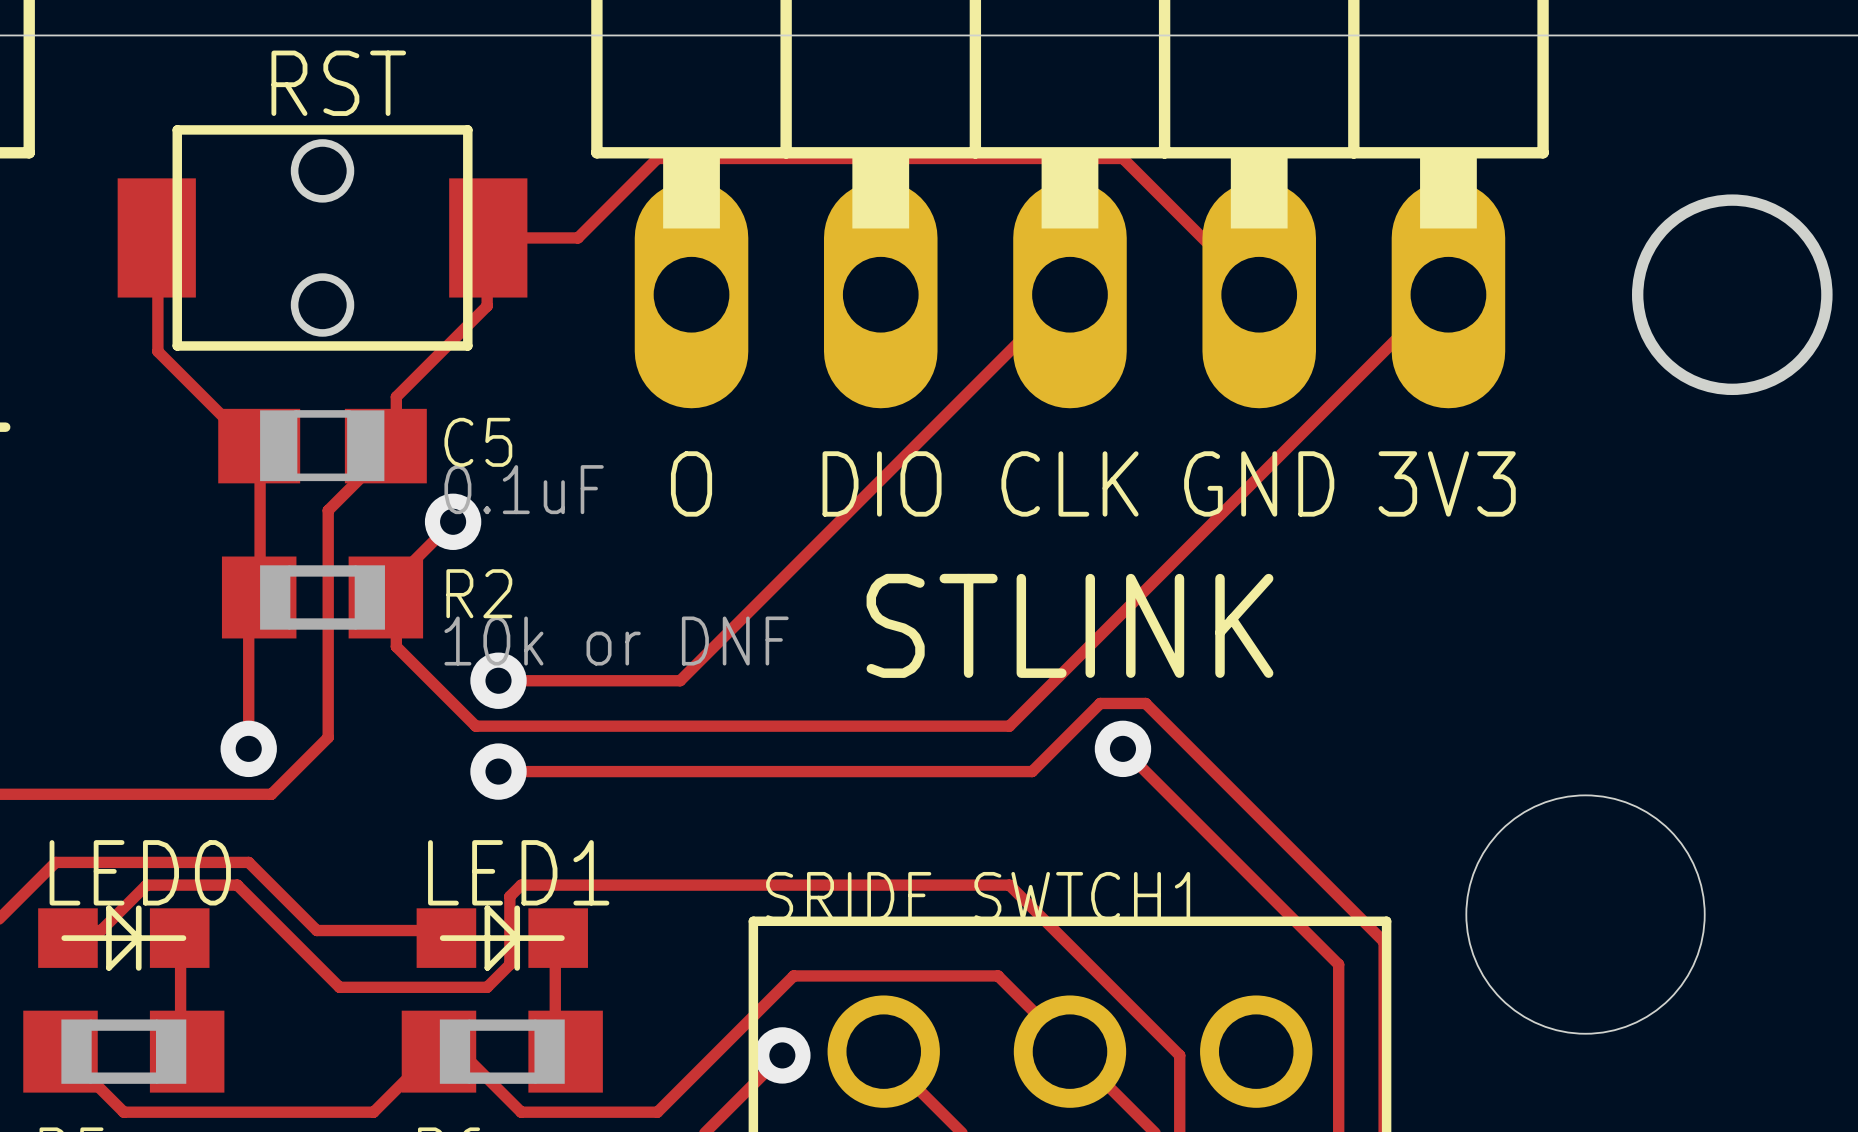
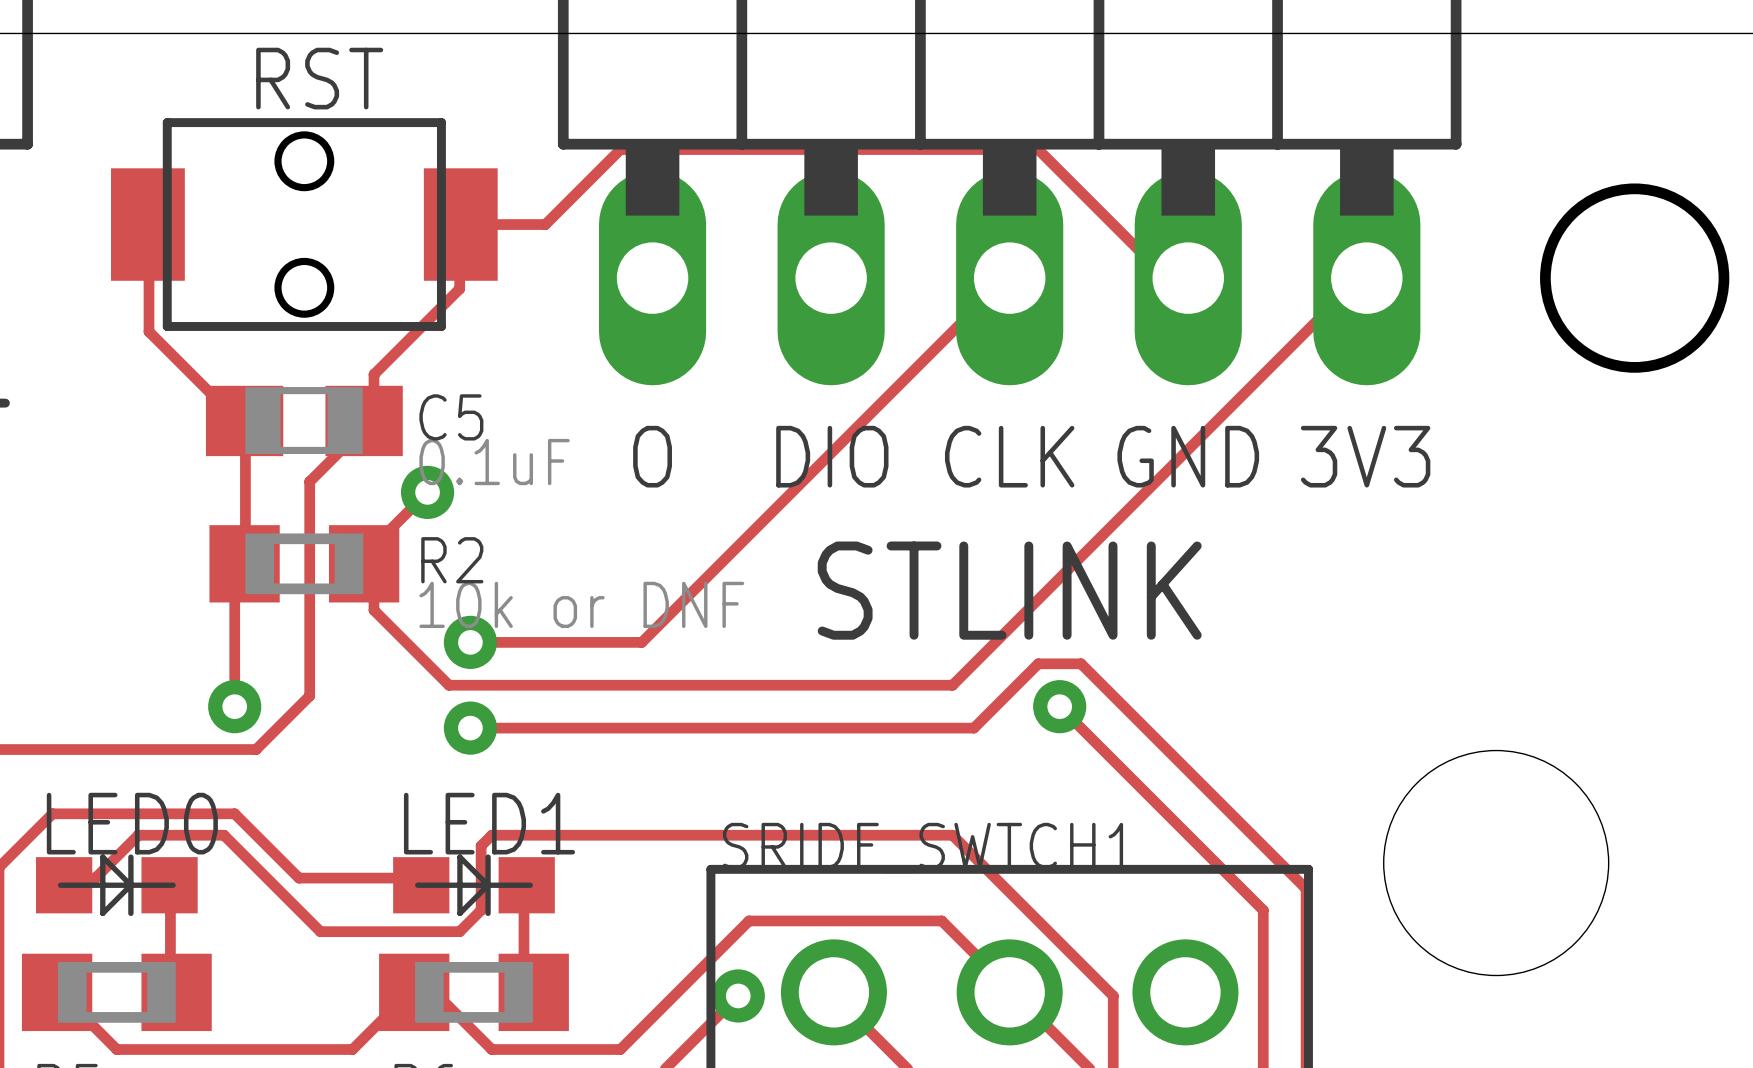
track: (1100, 158) (1122, 158) (1259, 294) -> (1038, 149) (1166, 278) (1188, 278)

